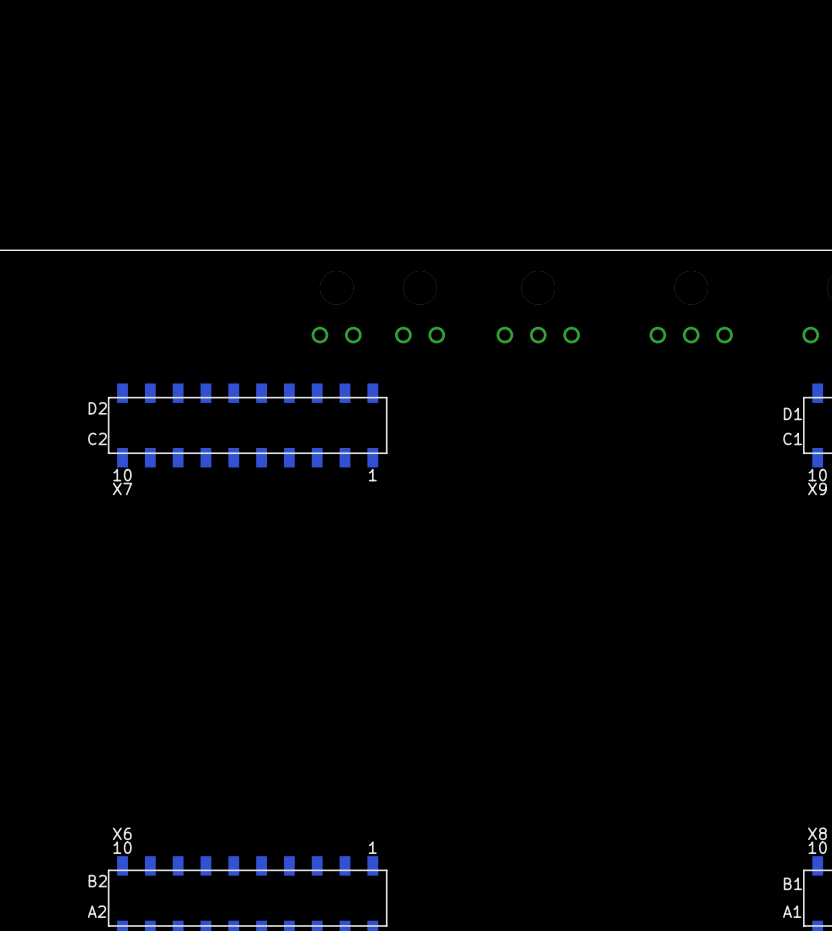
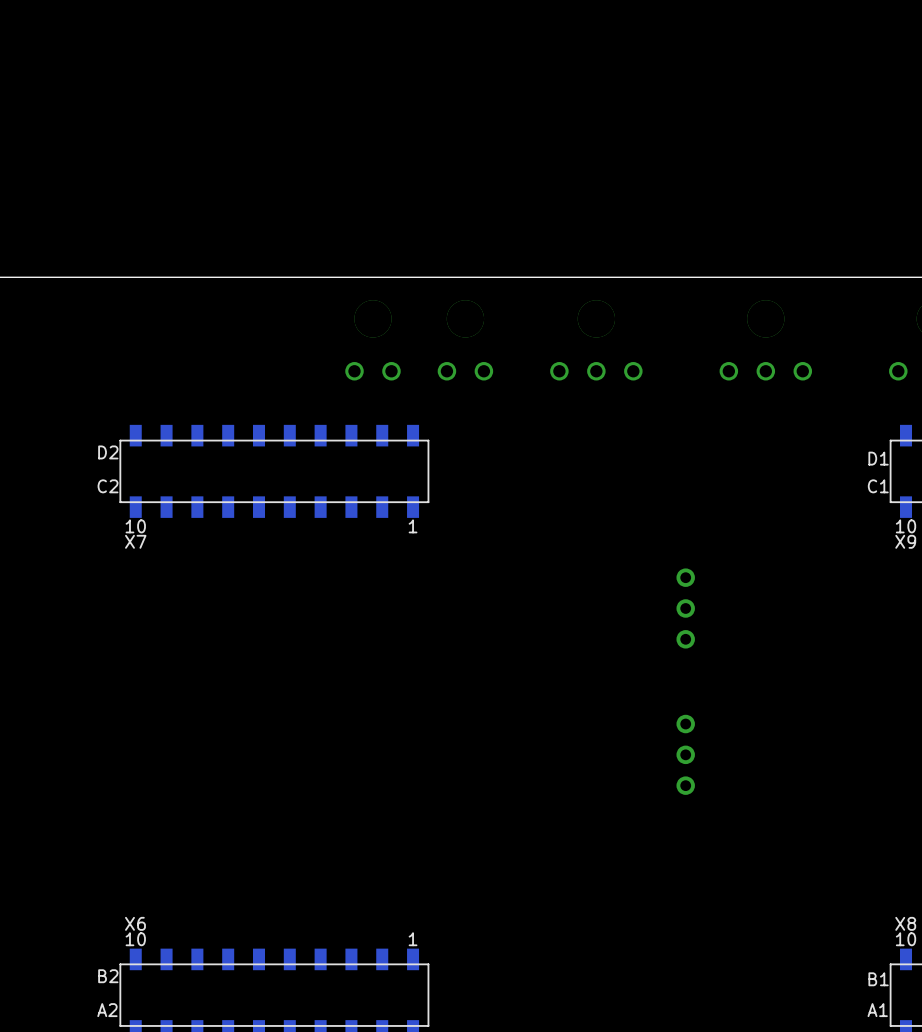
part: none -> (685, 608)
part: none -> (685, 754)

